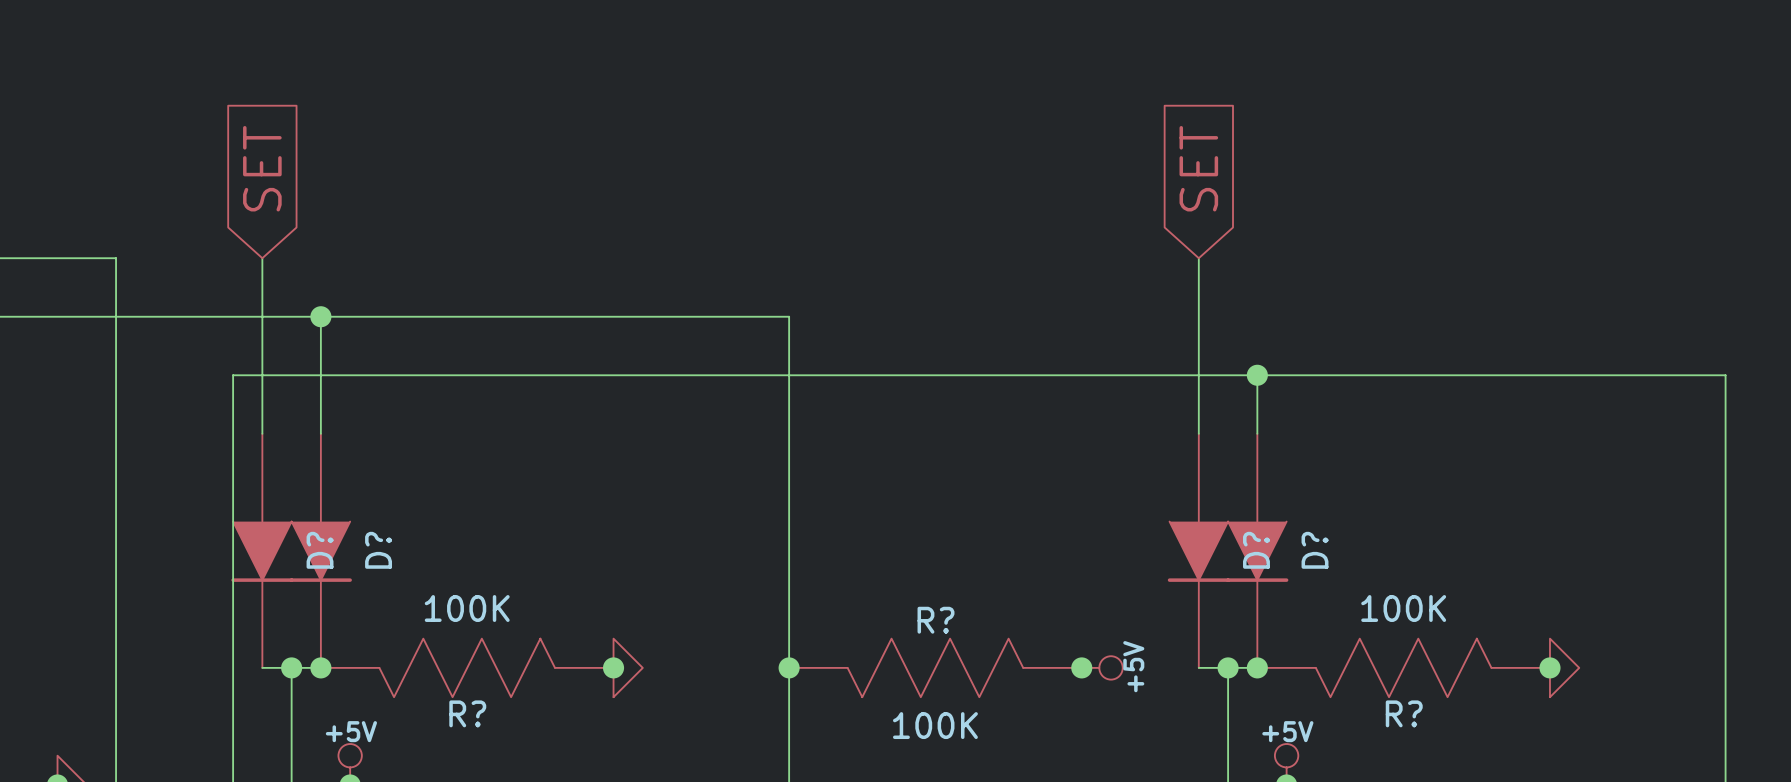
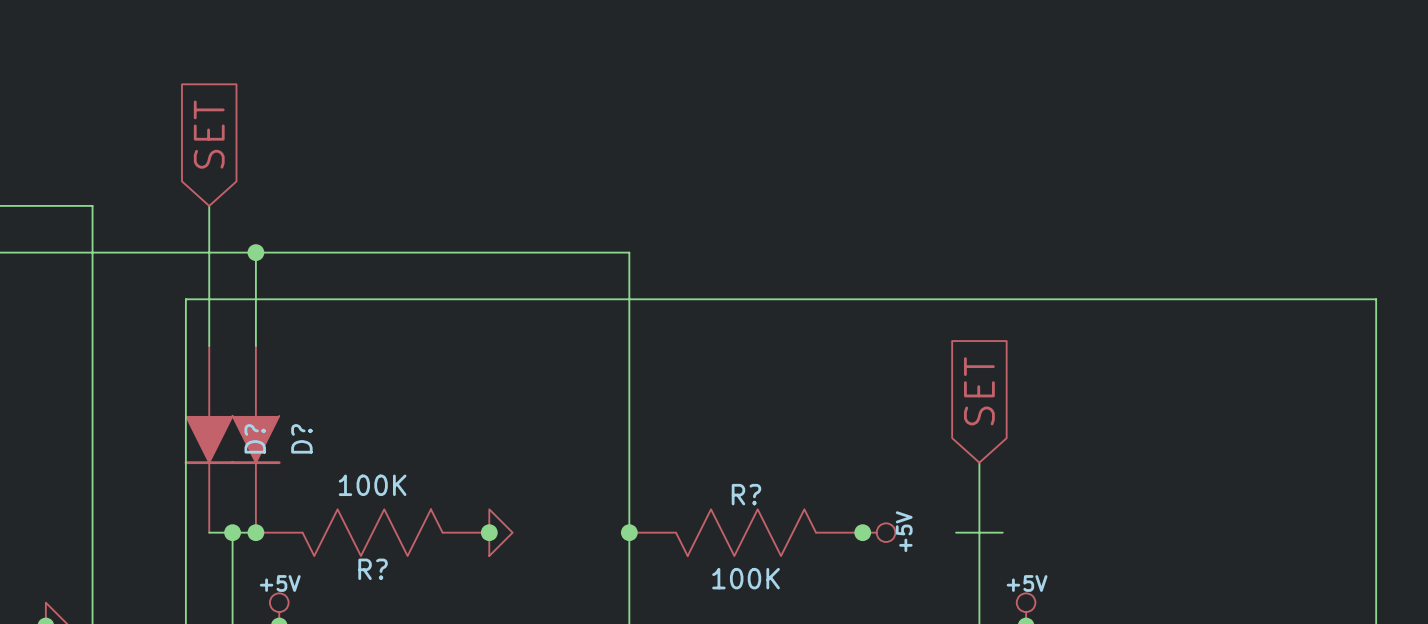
global label position: SET (1198, 168) -> SET (979, 391)
wire: (1198, 258) (1198, 433) -> none
wire: (1257, 375) (1257, 433) -> none
junction: (1257, 375) -> none
D?: (1198, 550) -> none
D?: (1257, 550) -> none
wire: none -> (979, 462) (979, 532)
junction: (1228, 667) -> none
junction: (1257, 667) -> none
R?: 100K (1403, 667) -> none
junction: (1549, 667) -> none
power symbol: (1564, 667) -> none

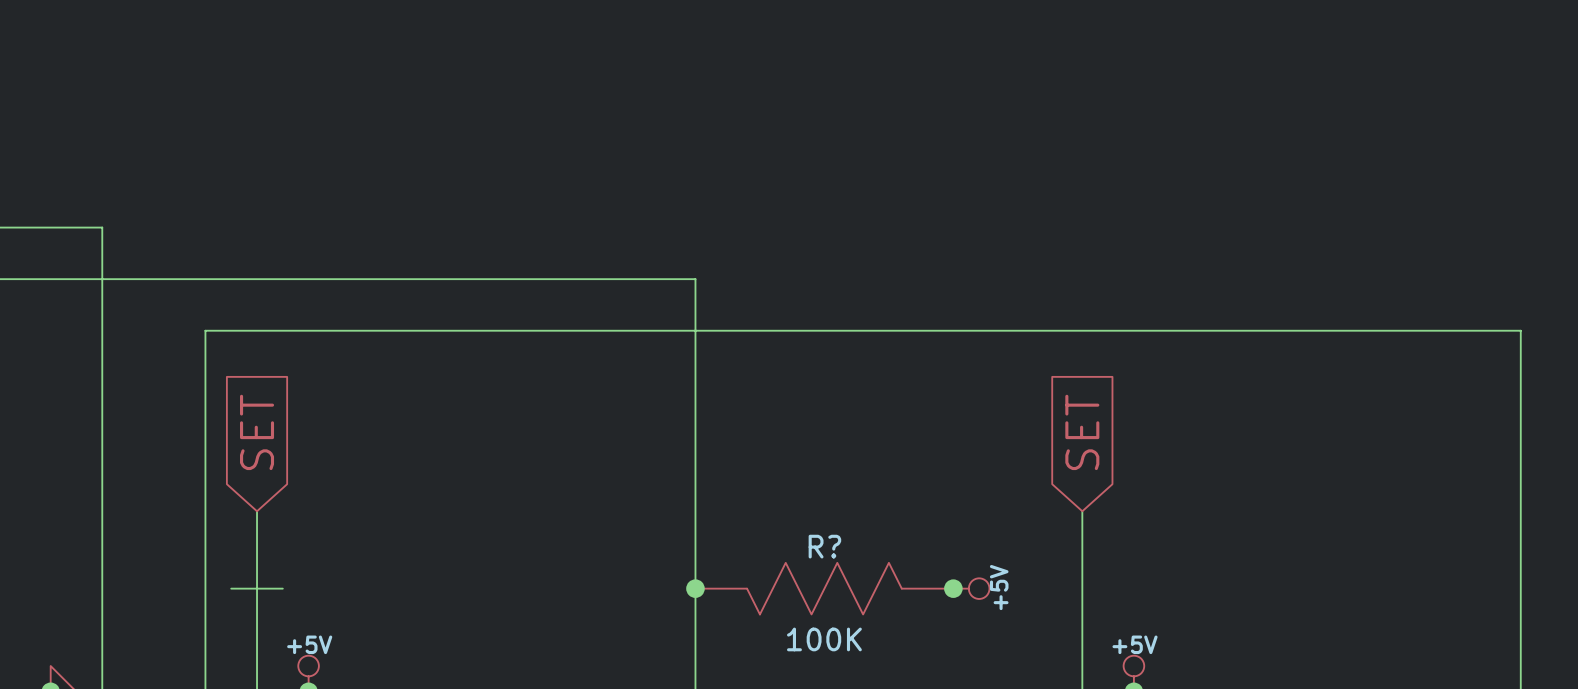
global label position: SET (209, 134) -> SET (257, 432)
wire: (209, 205) (209, 345) -> none
wire: (255, 252) (255, 345) -> none
junction: (255, 252) -> none
D?: (209, 439) -> none
D?: (255, 439) -> none
wire: none -> (257, 511) (257, 588)
junction: (232, 532) -> none
junction: (255, 532) -> none
R?: 100K (372, 532) -> none
junction: (489, 532) -> none
power symbol: (500, 532) -> none
wire: (956, 532) (1002, 532) -> none

